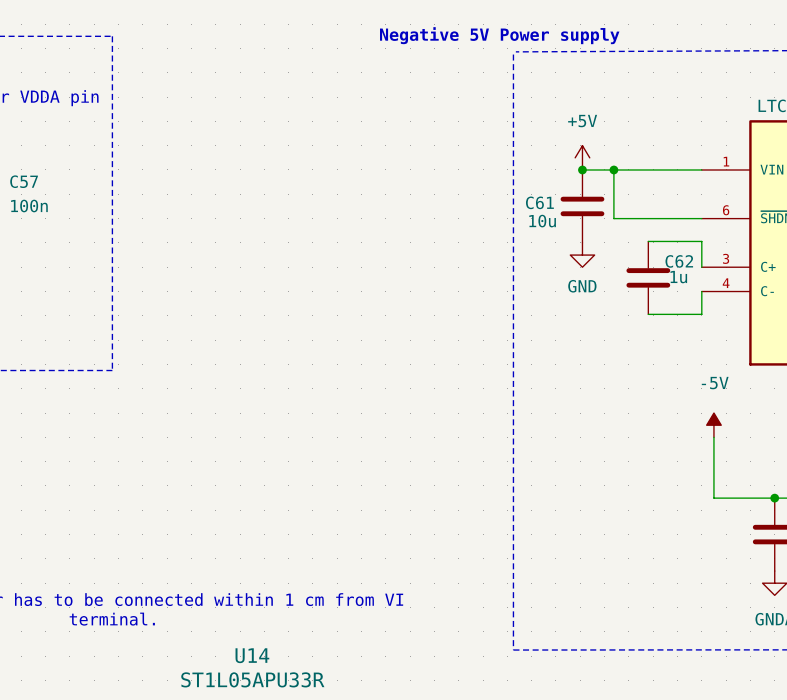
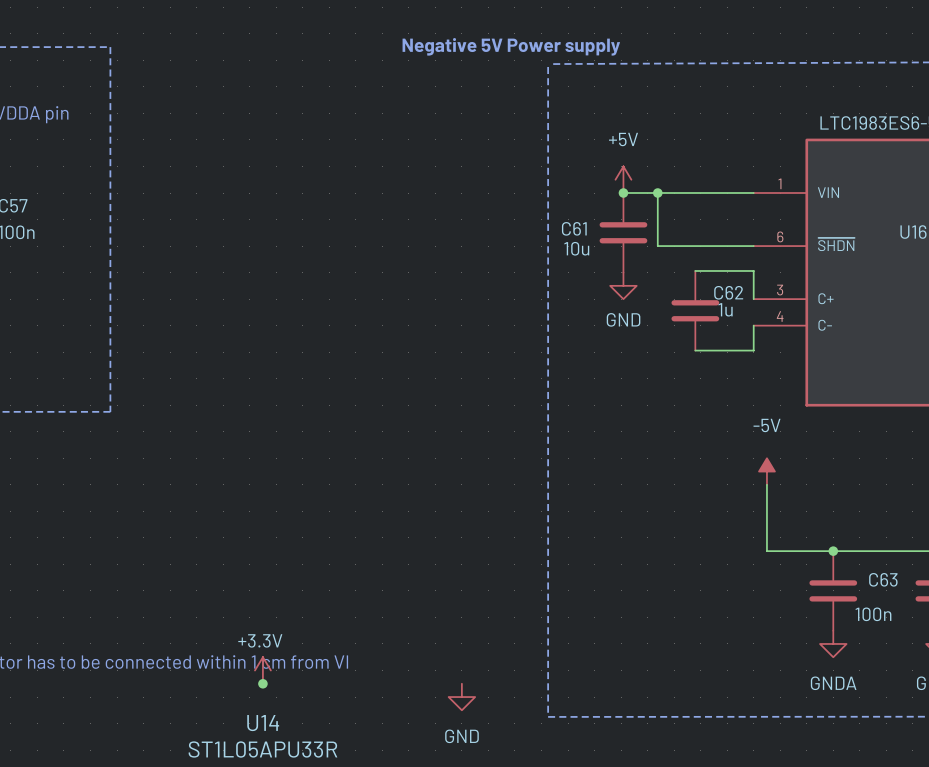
power symbol: none -> +3.3V (262, 670)
text: terminal. (112, 619) -> none
junction: none -> (262, 683)
power symbol: none -> GND (461, 697)

